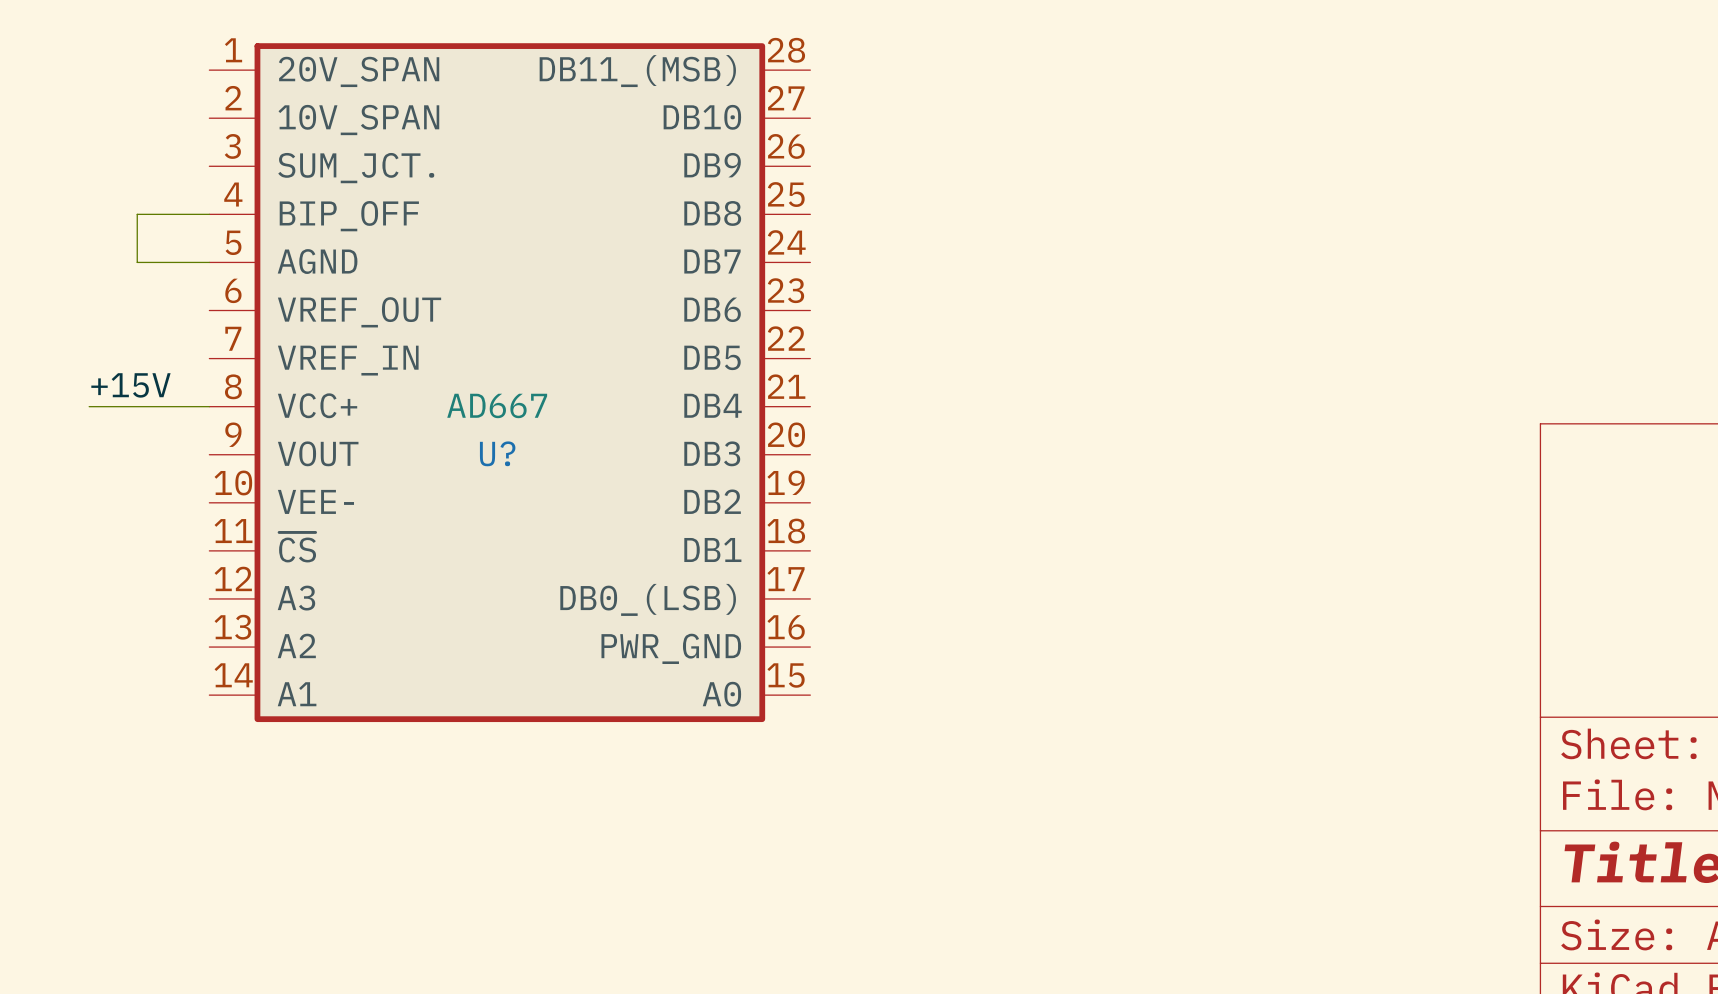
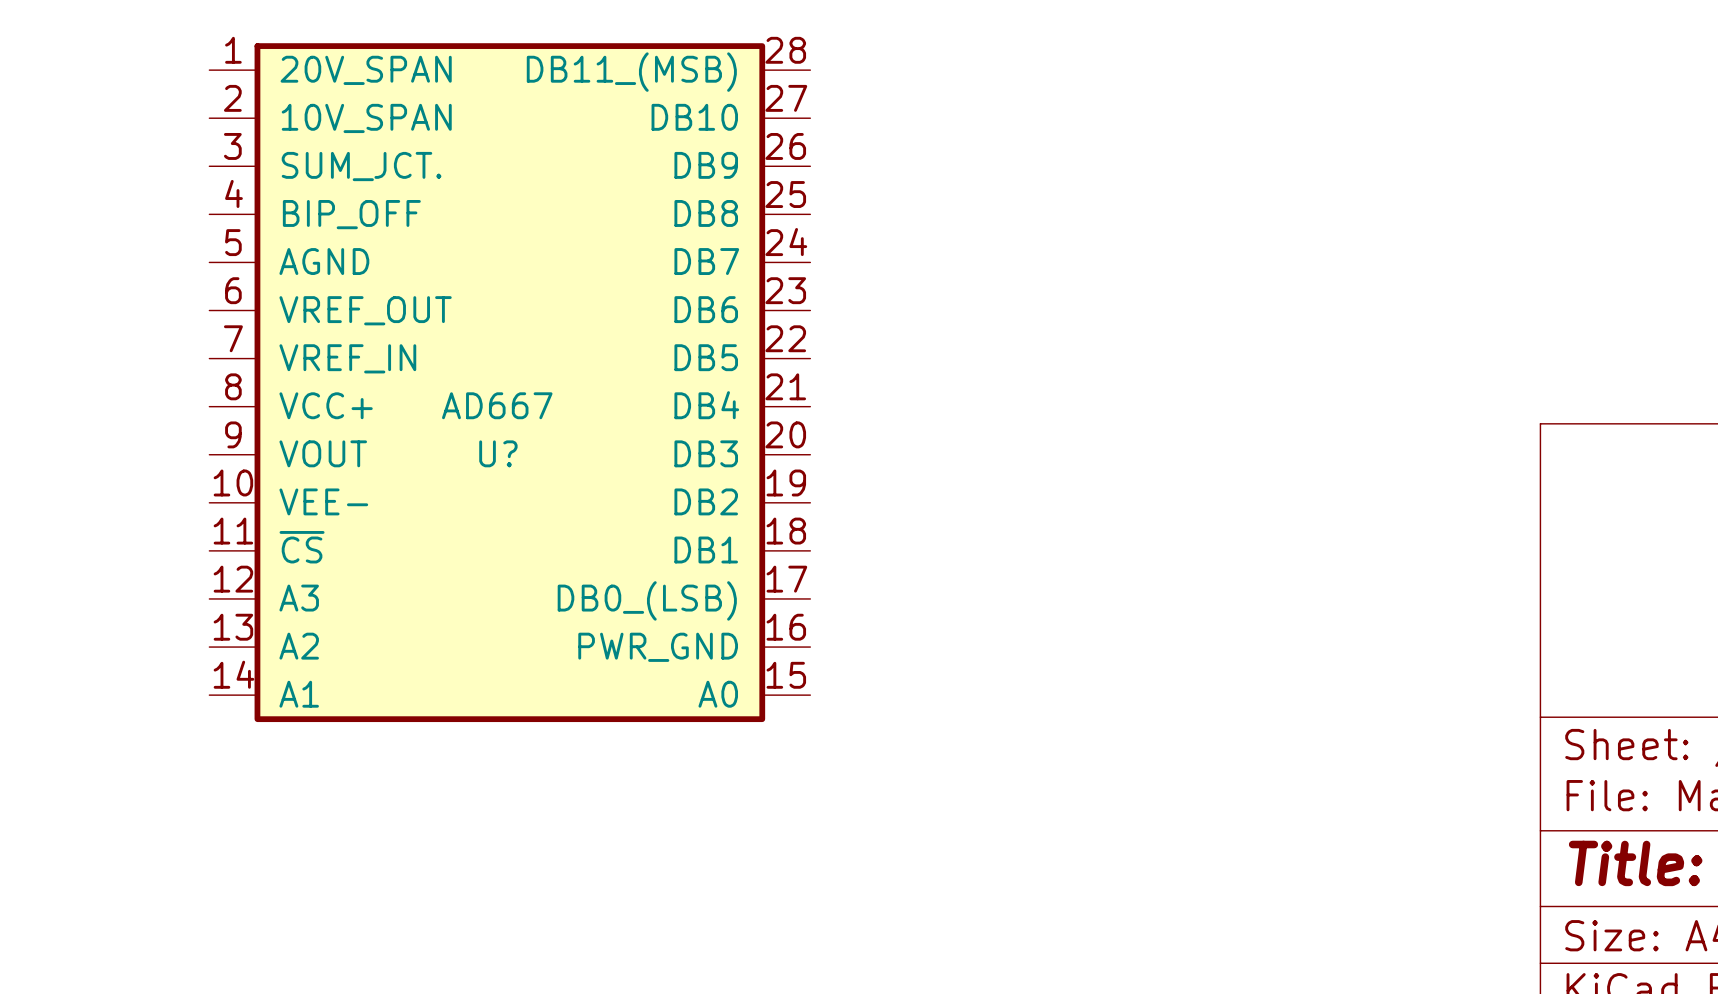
wire: (209, 214) (137, 214) (137, 262) (209, 262) -> none
label: +15V (130, 385) -> none
wire: (89, 406) (209, 406) -> none

